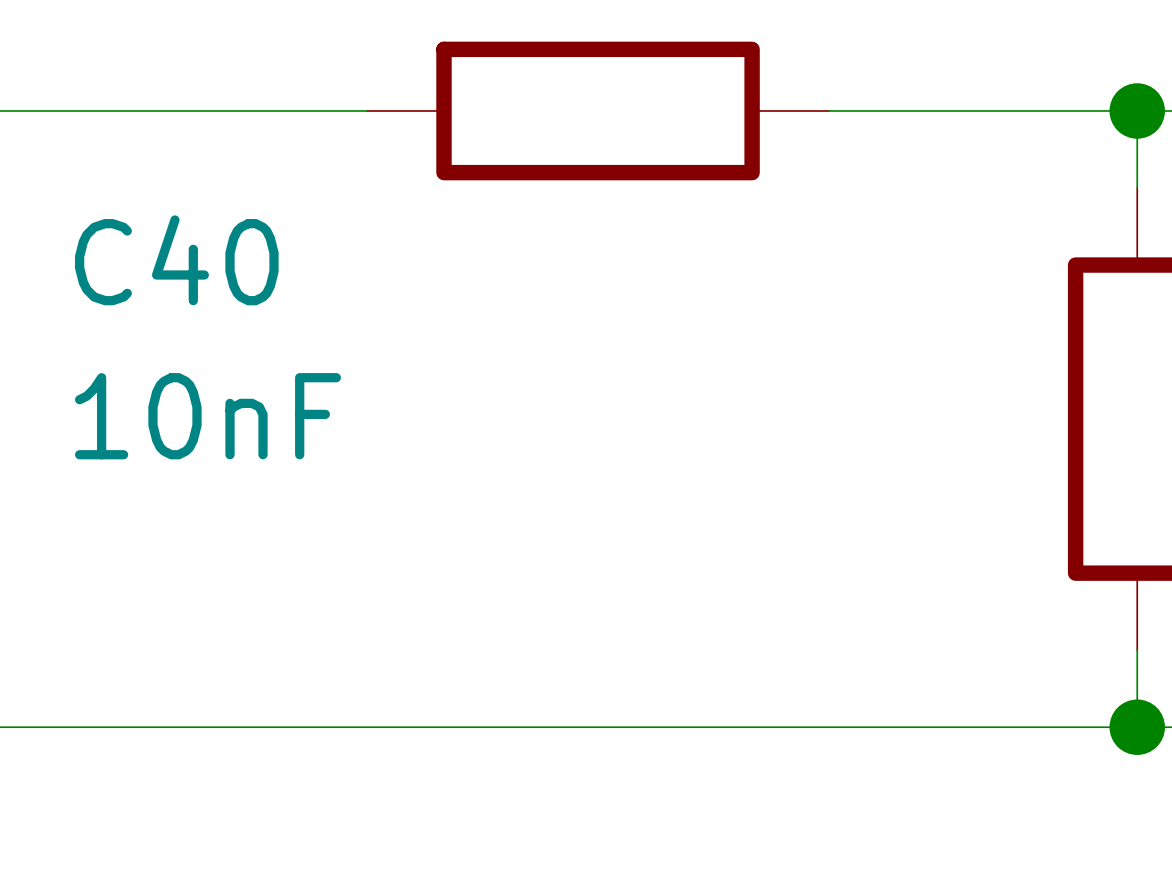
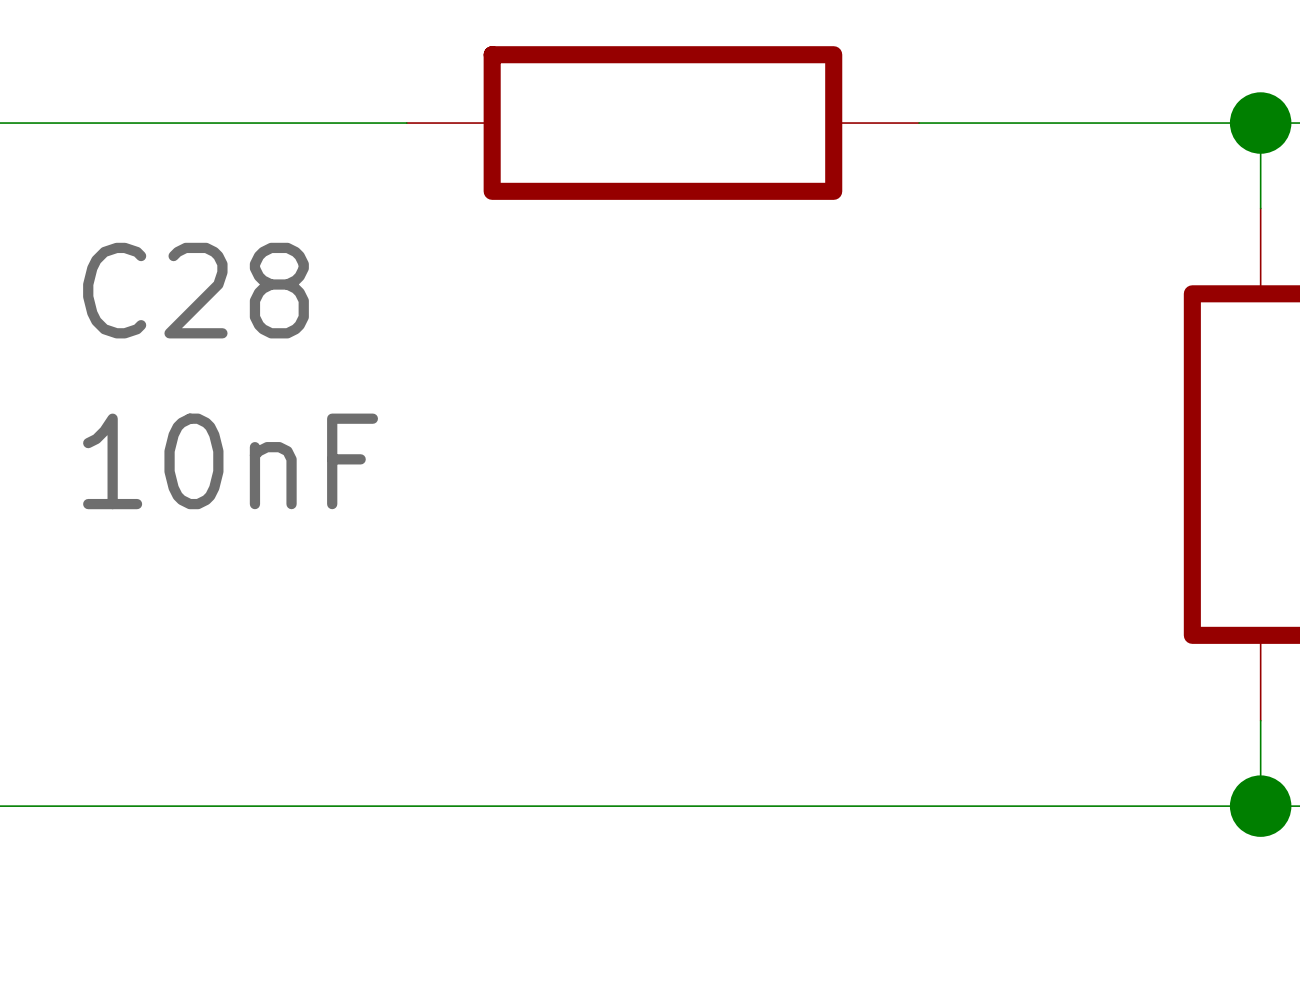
C40 name: C40 (176, 260) -> C28 (195, 290)

